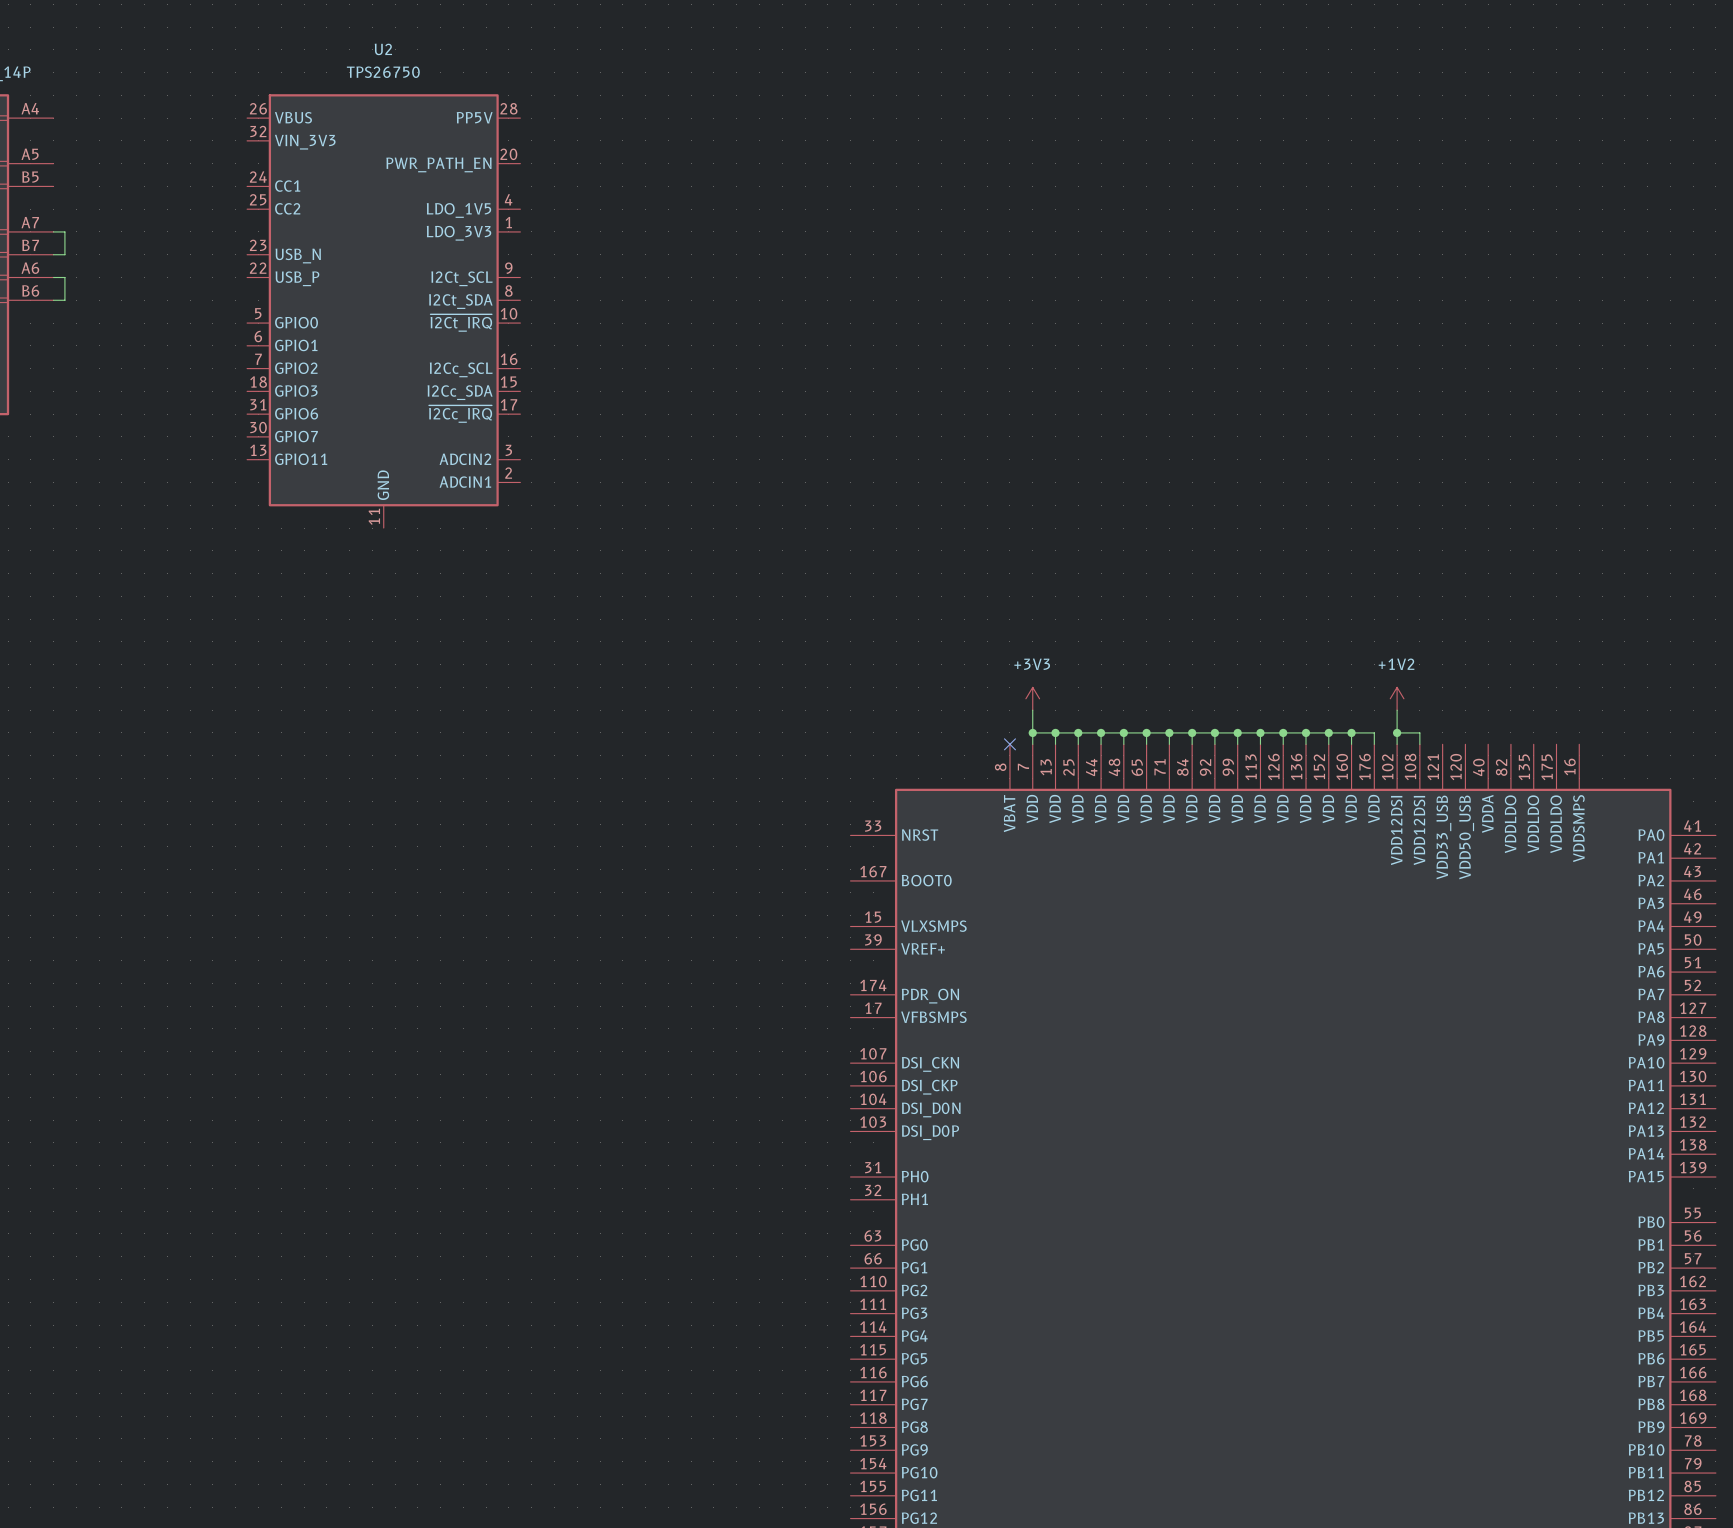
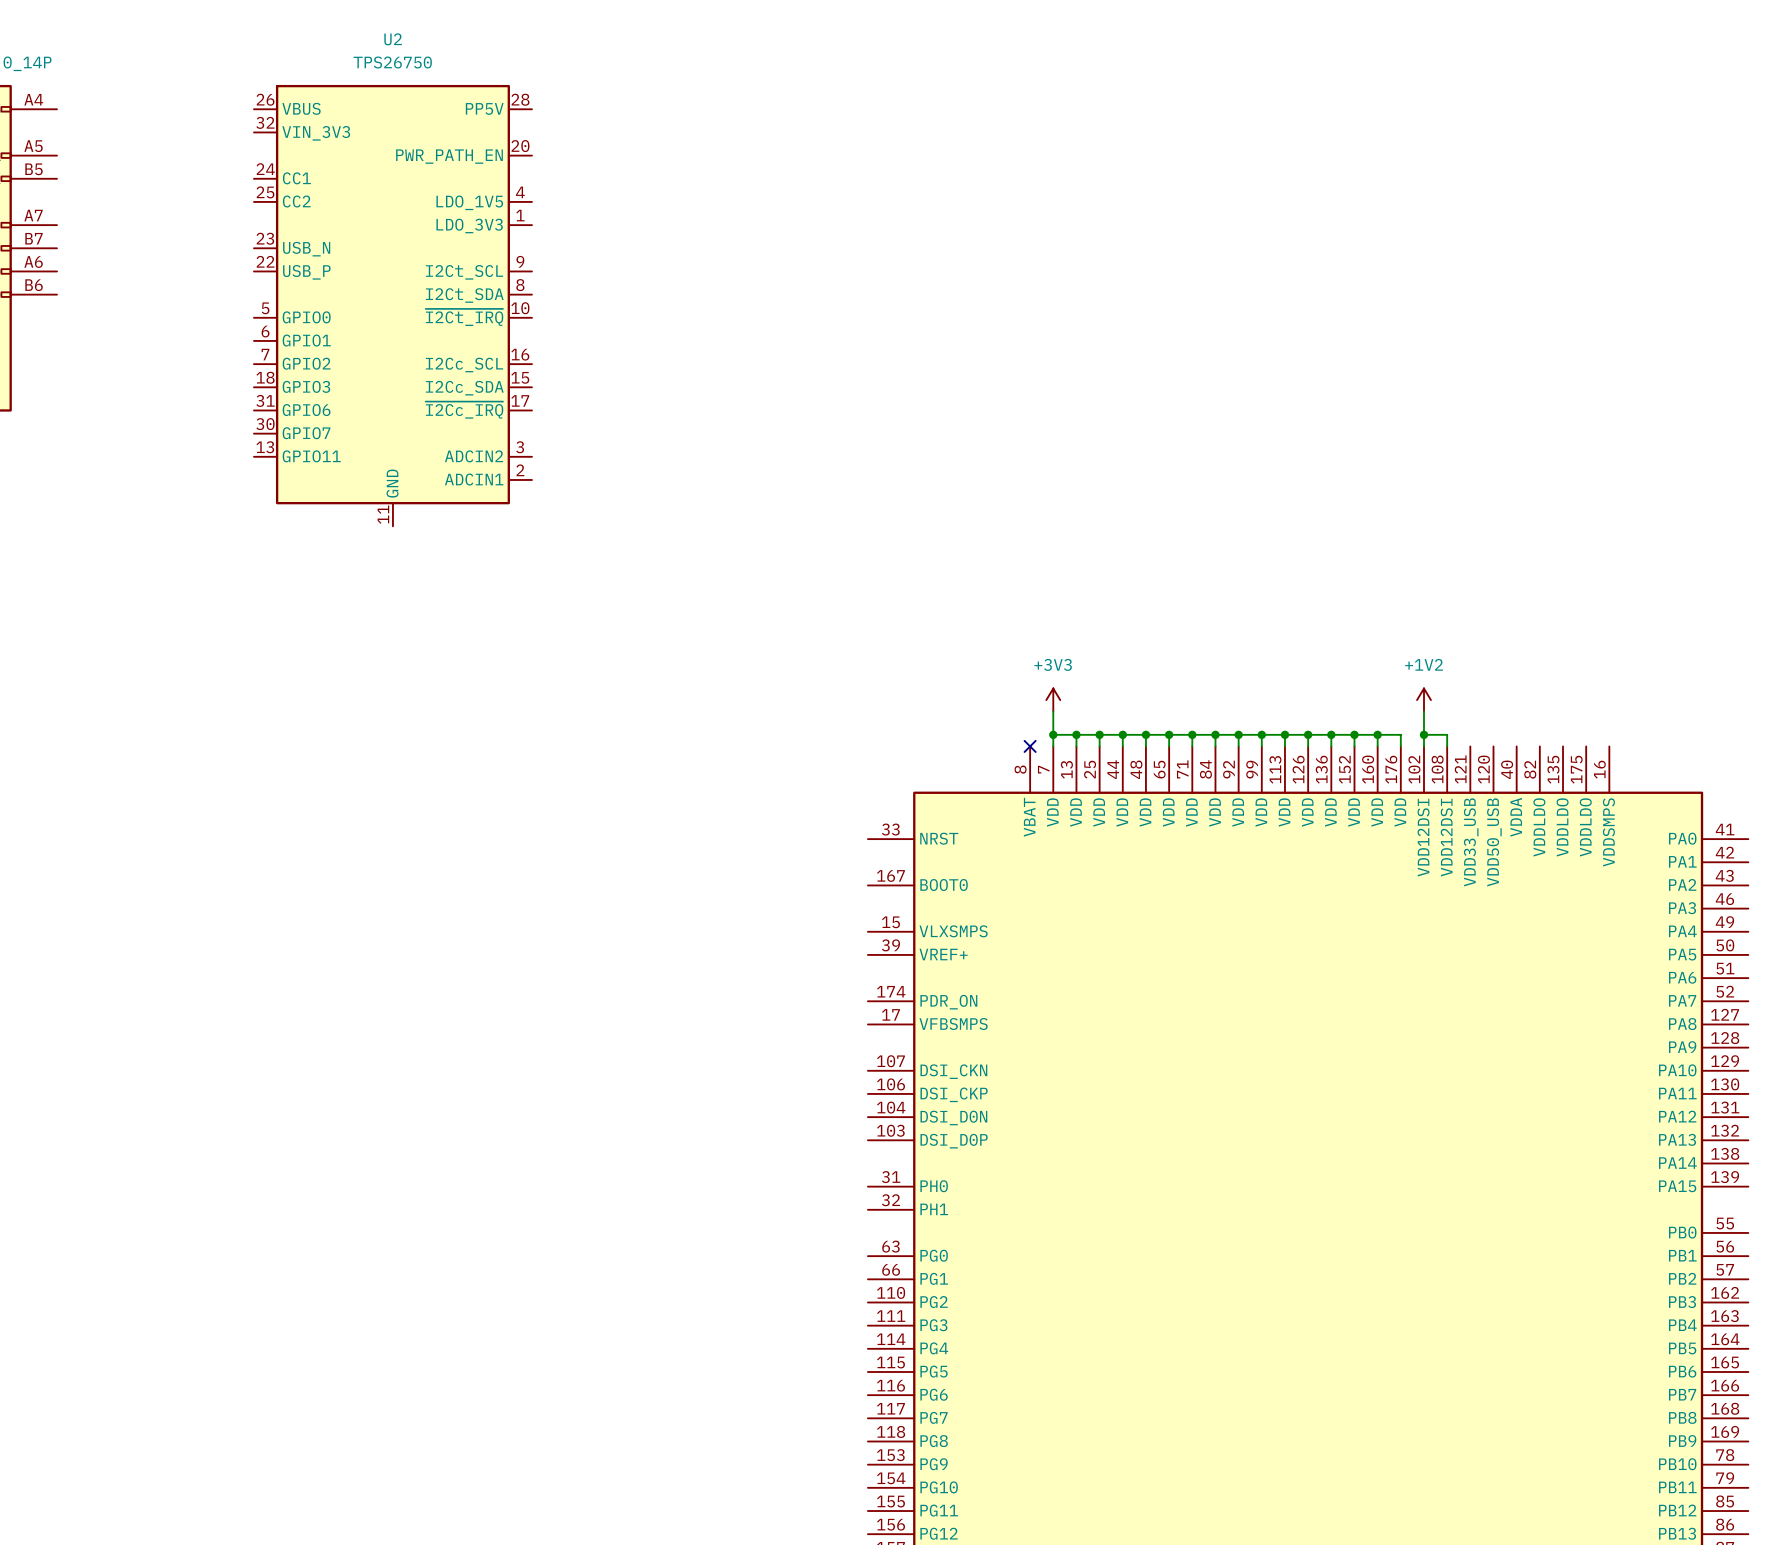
wire: (53, 231) (64, 231) (64, 254) (53, 254) -> none
wire: (53, 277) (64, 277) (64, 300) (53, 300) -> none

